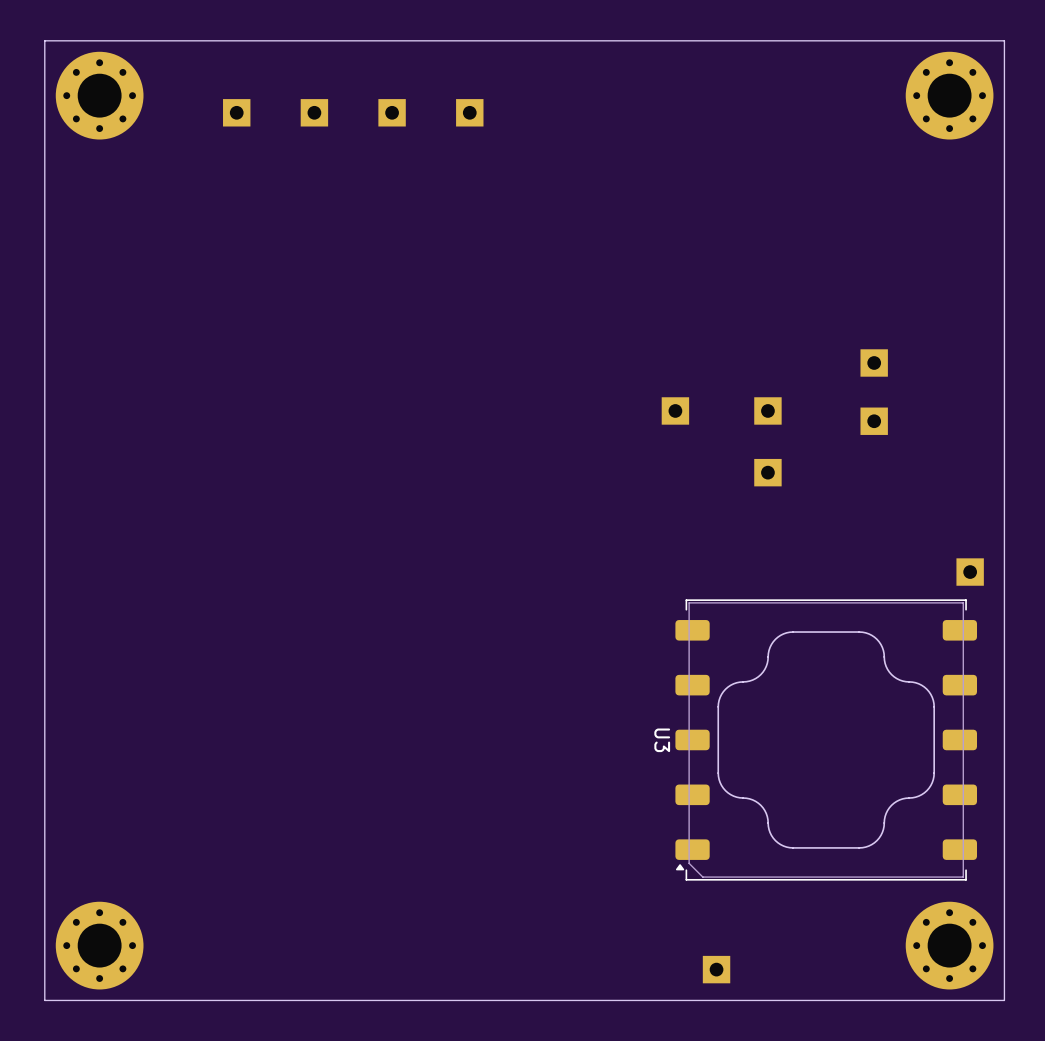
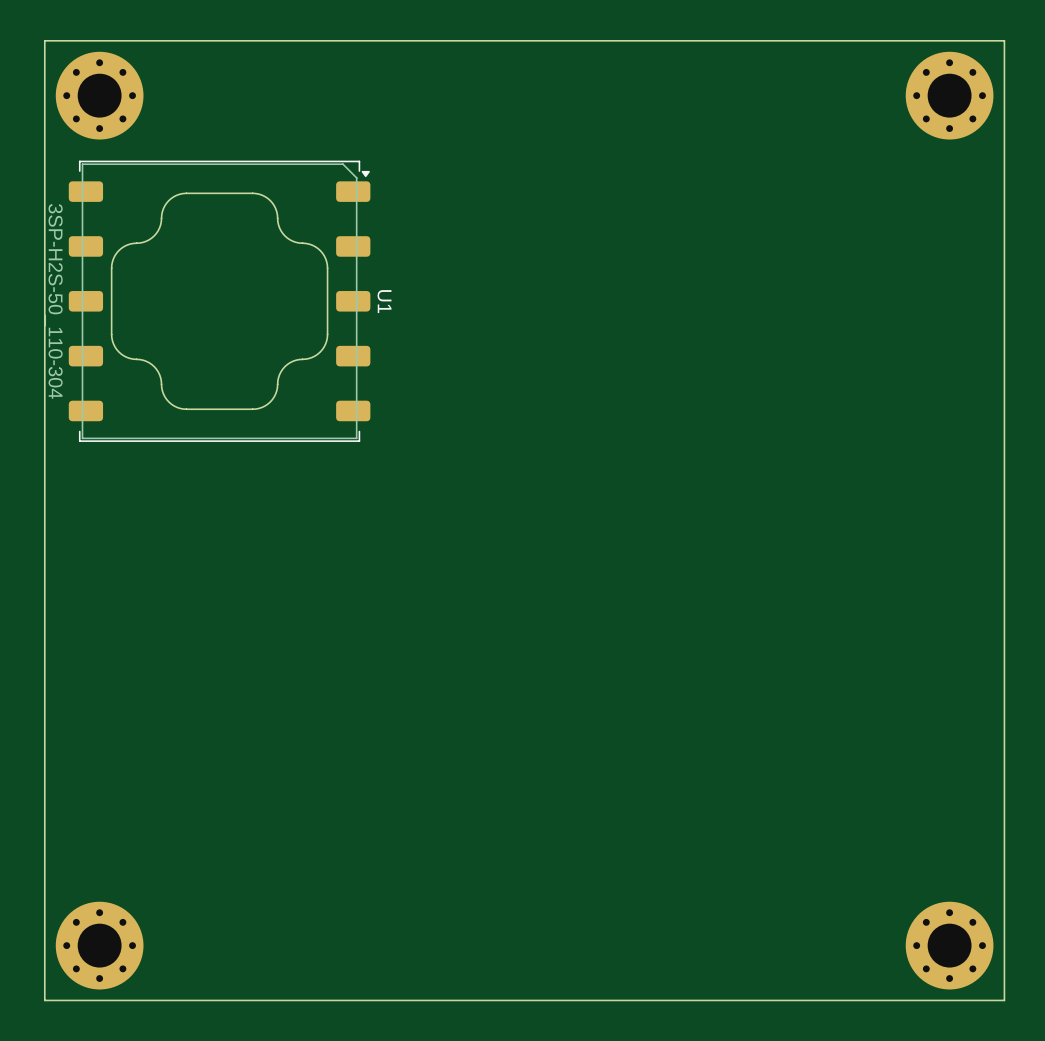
part: (236, 112) -> none
part: (314, 112) -> none
part: (392, 112) -> none
part: (469, 112) -> none
U1: none -> 3SP-H2S-50_110-304 (219, 301)
part: (874, 362) -> none
part: (675, 410) -> none
part: (767, 410) -> none
part: (874, 421) -> none
part: (767, 472) -> none
part: (970, 572) -> none
U3: (826, 739) -> none
part: (716, 969) -> none

